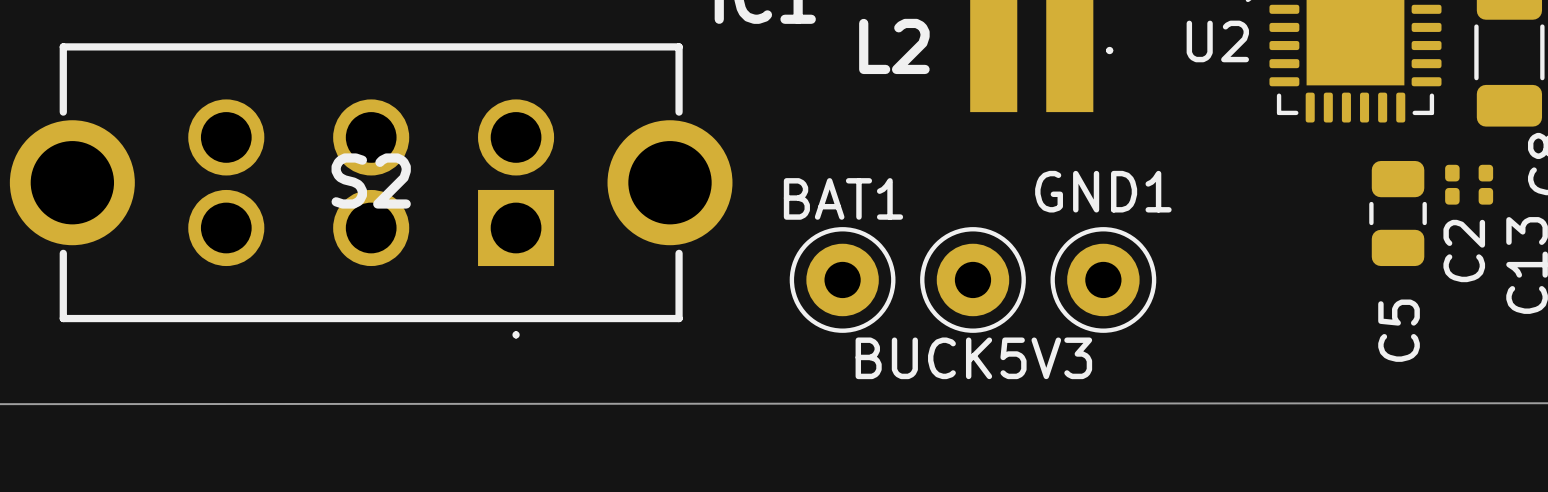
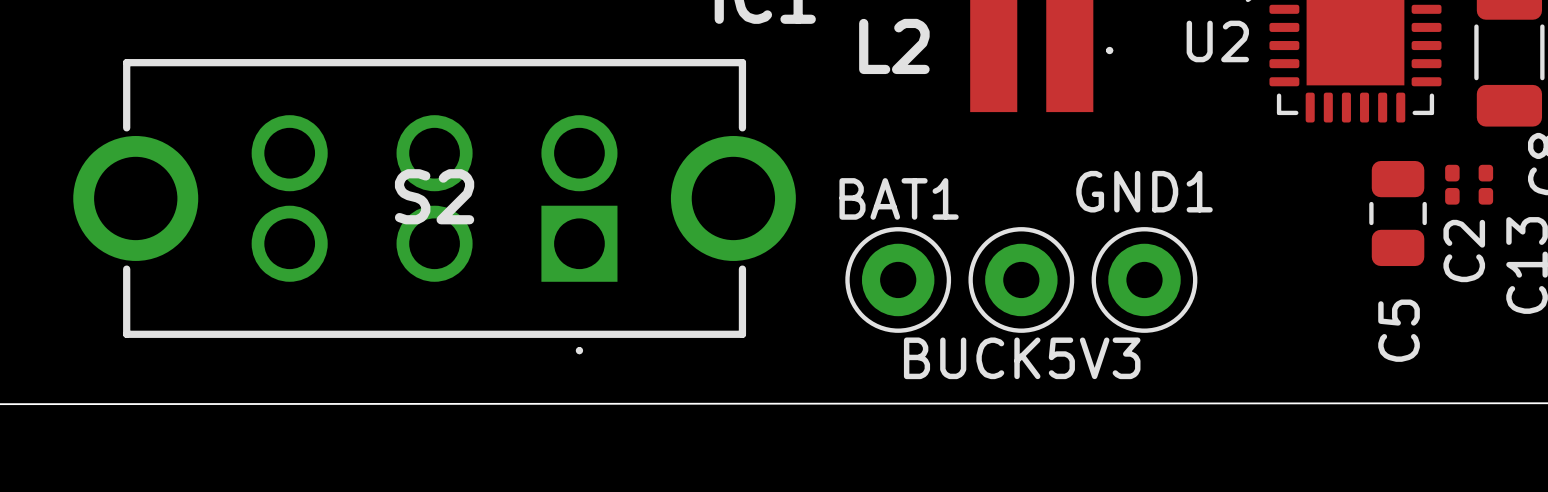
S2 position: (371, 190) -> (434, 206)
BAT1 position: (842, 279) -> (898, 279)
BUCK5V3 position: (972, 279) -> (1021, 279)
GND1 position: (1103, 279) -> (1144, 279)

